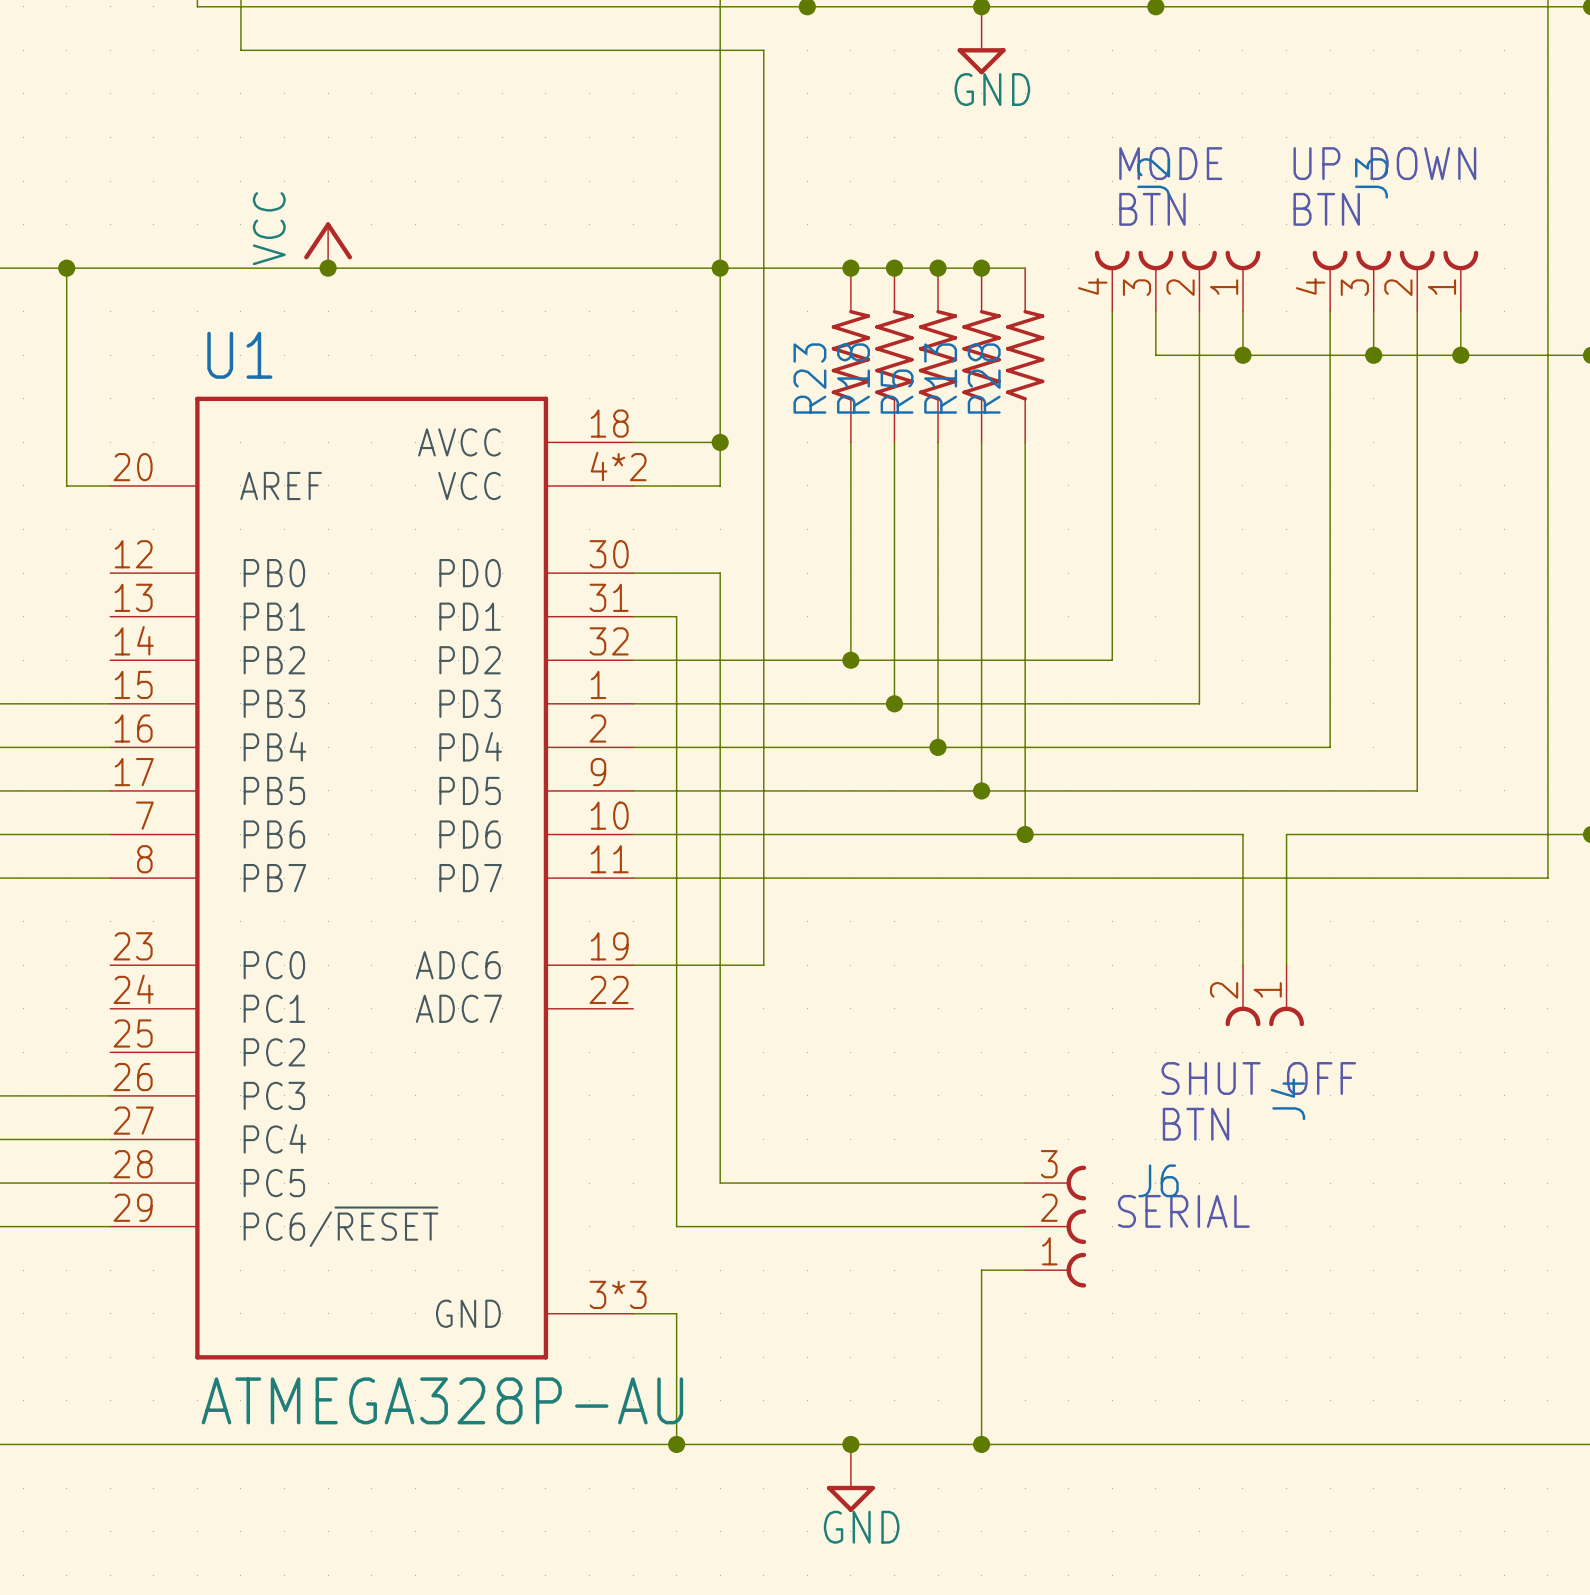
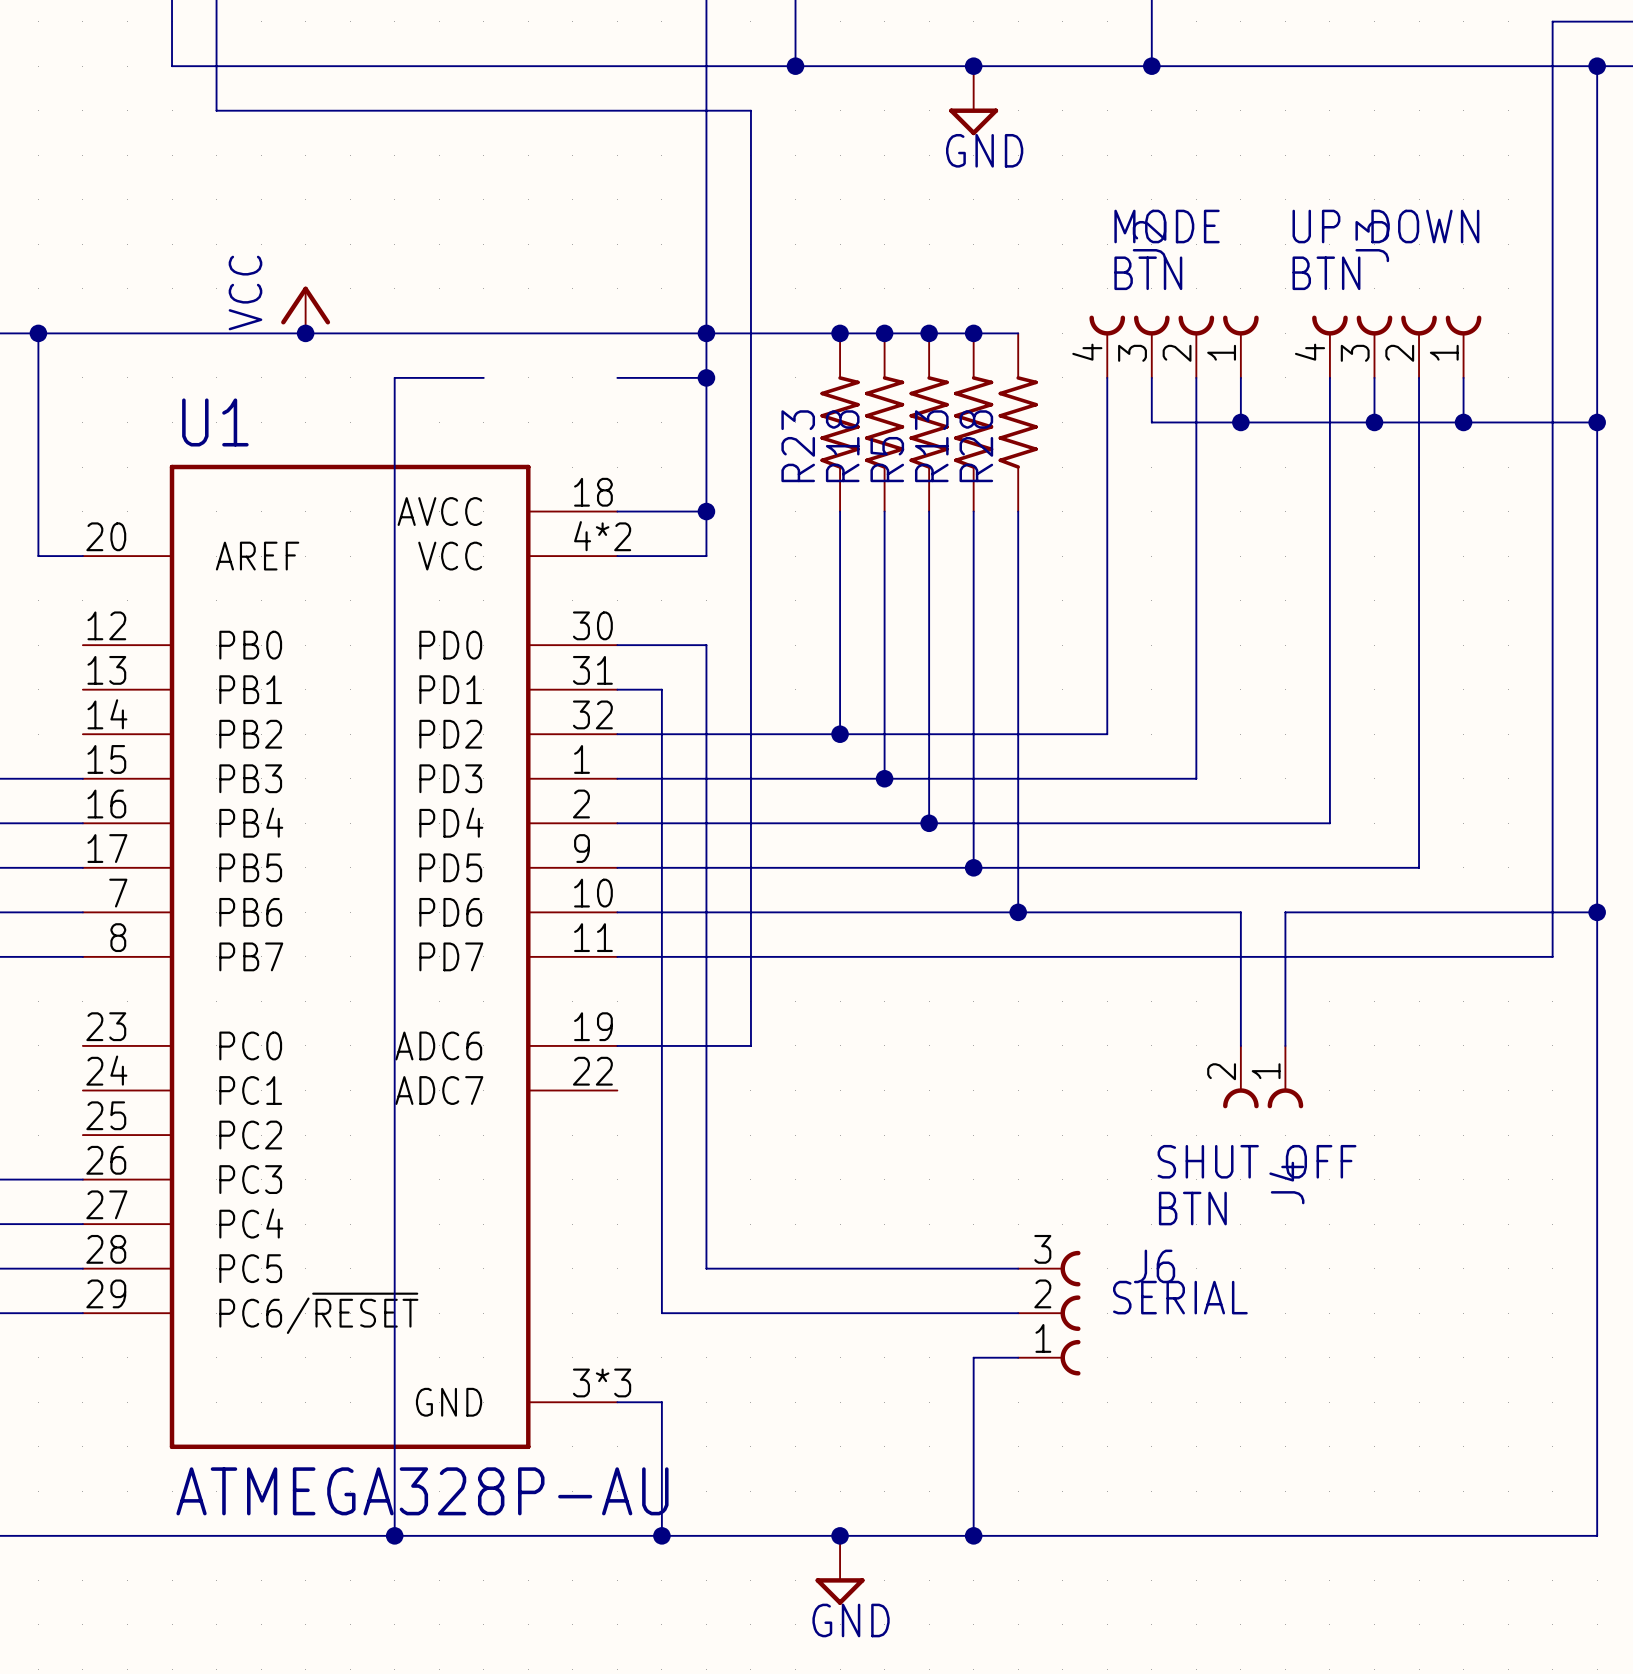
wire: none -> (483, 377) (394, 377) (394, 1535)
wire: none -> (617, 377) (706, 377)
junction: none -> (706, 377)
junction: none -> (394, 1535)

